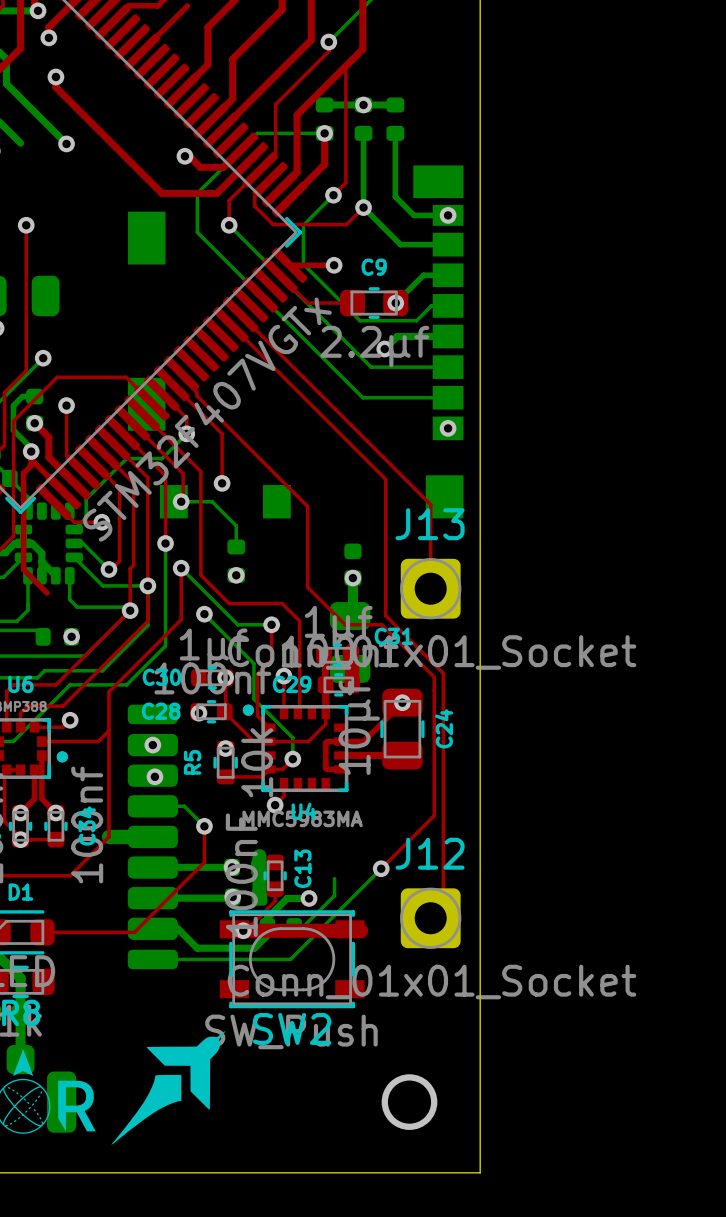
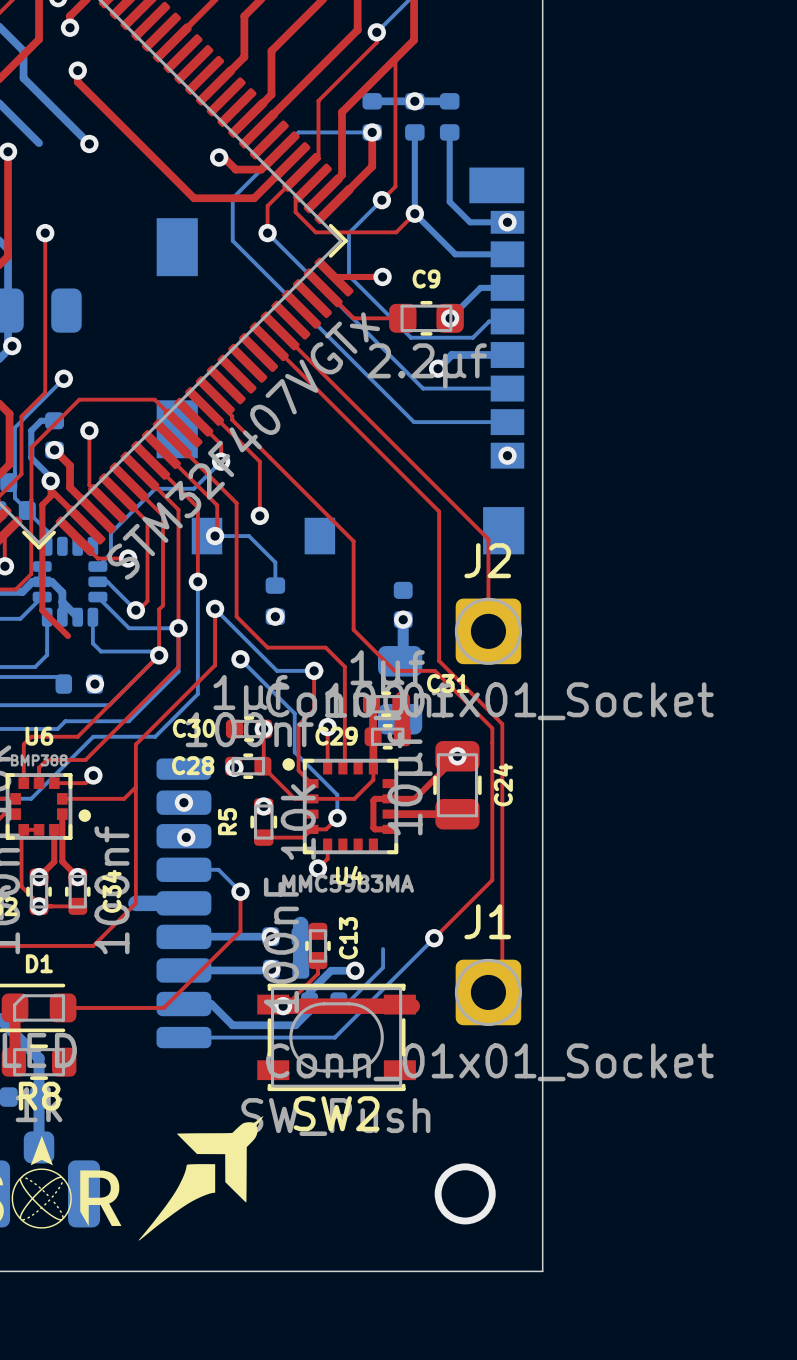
J13 name: J13 (430, 524) -> J2 (487, 560)
J12 name: J12 (430, 853) -> J1 (487, 921)

